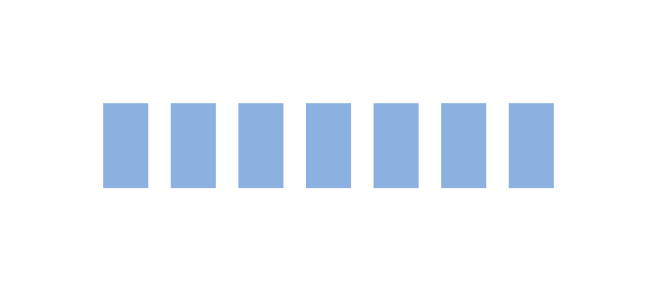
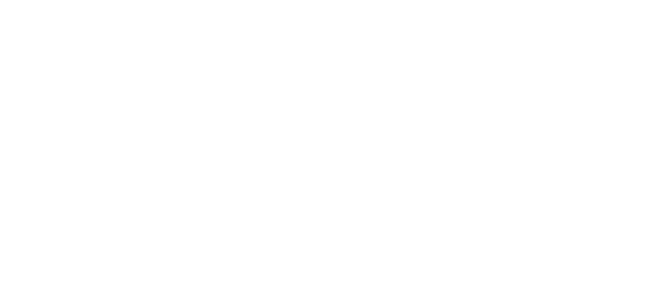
part: (328, 145) -> none

